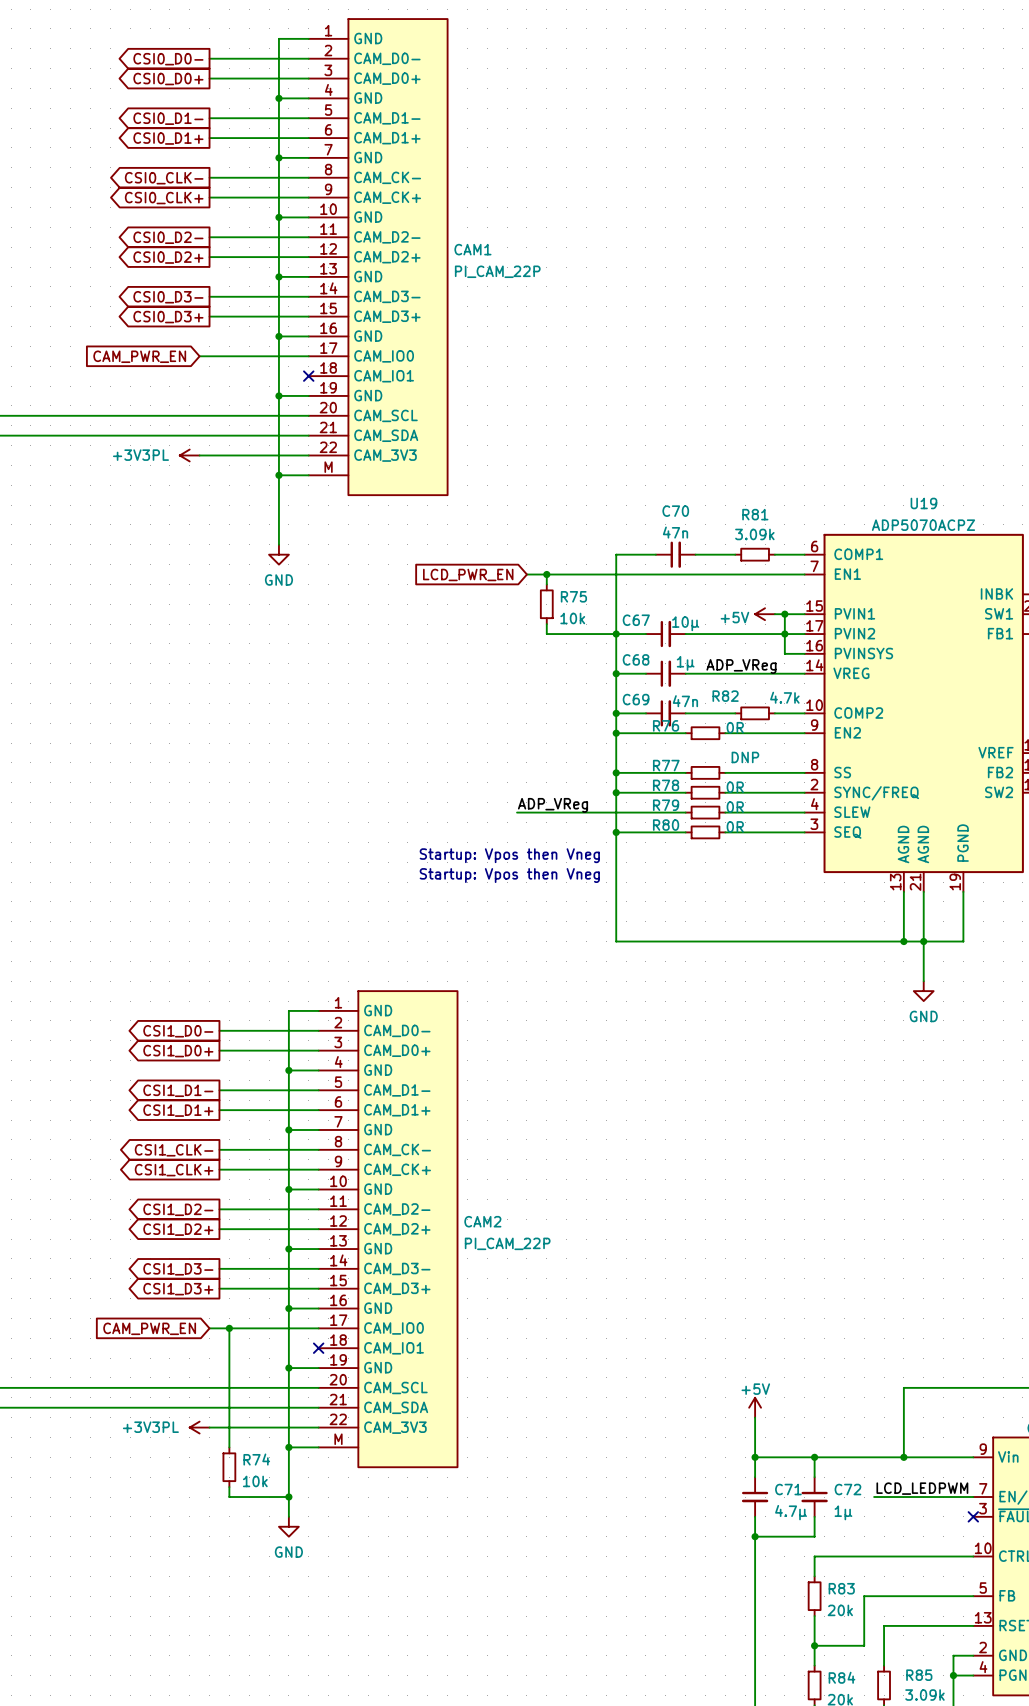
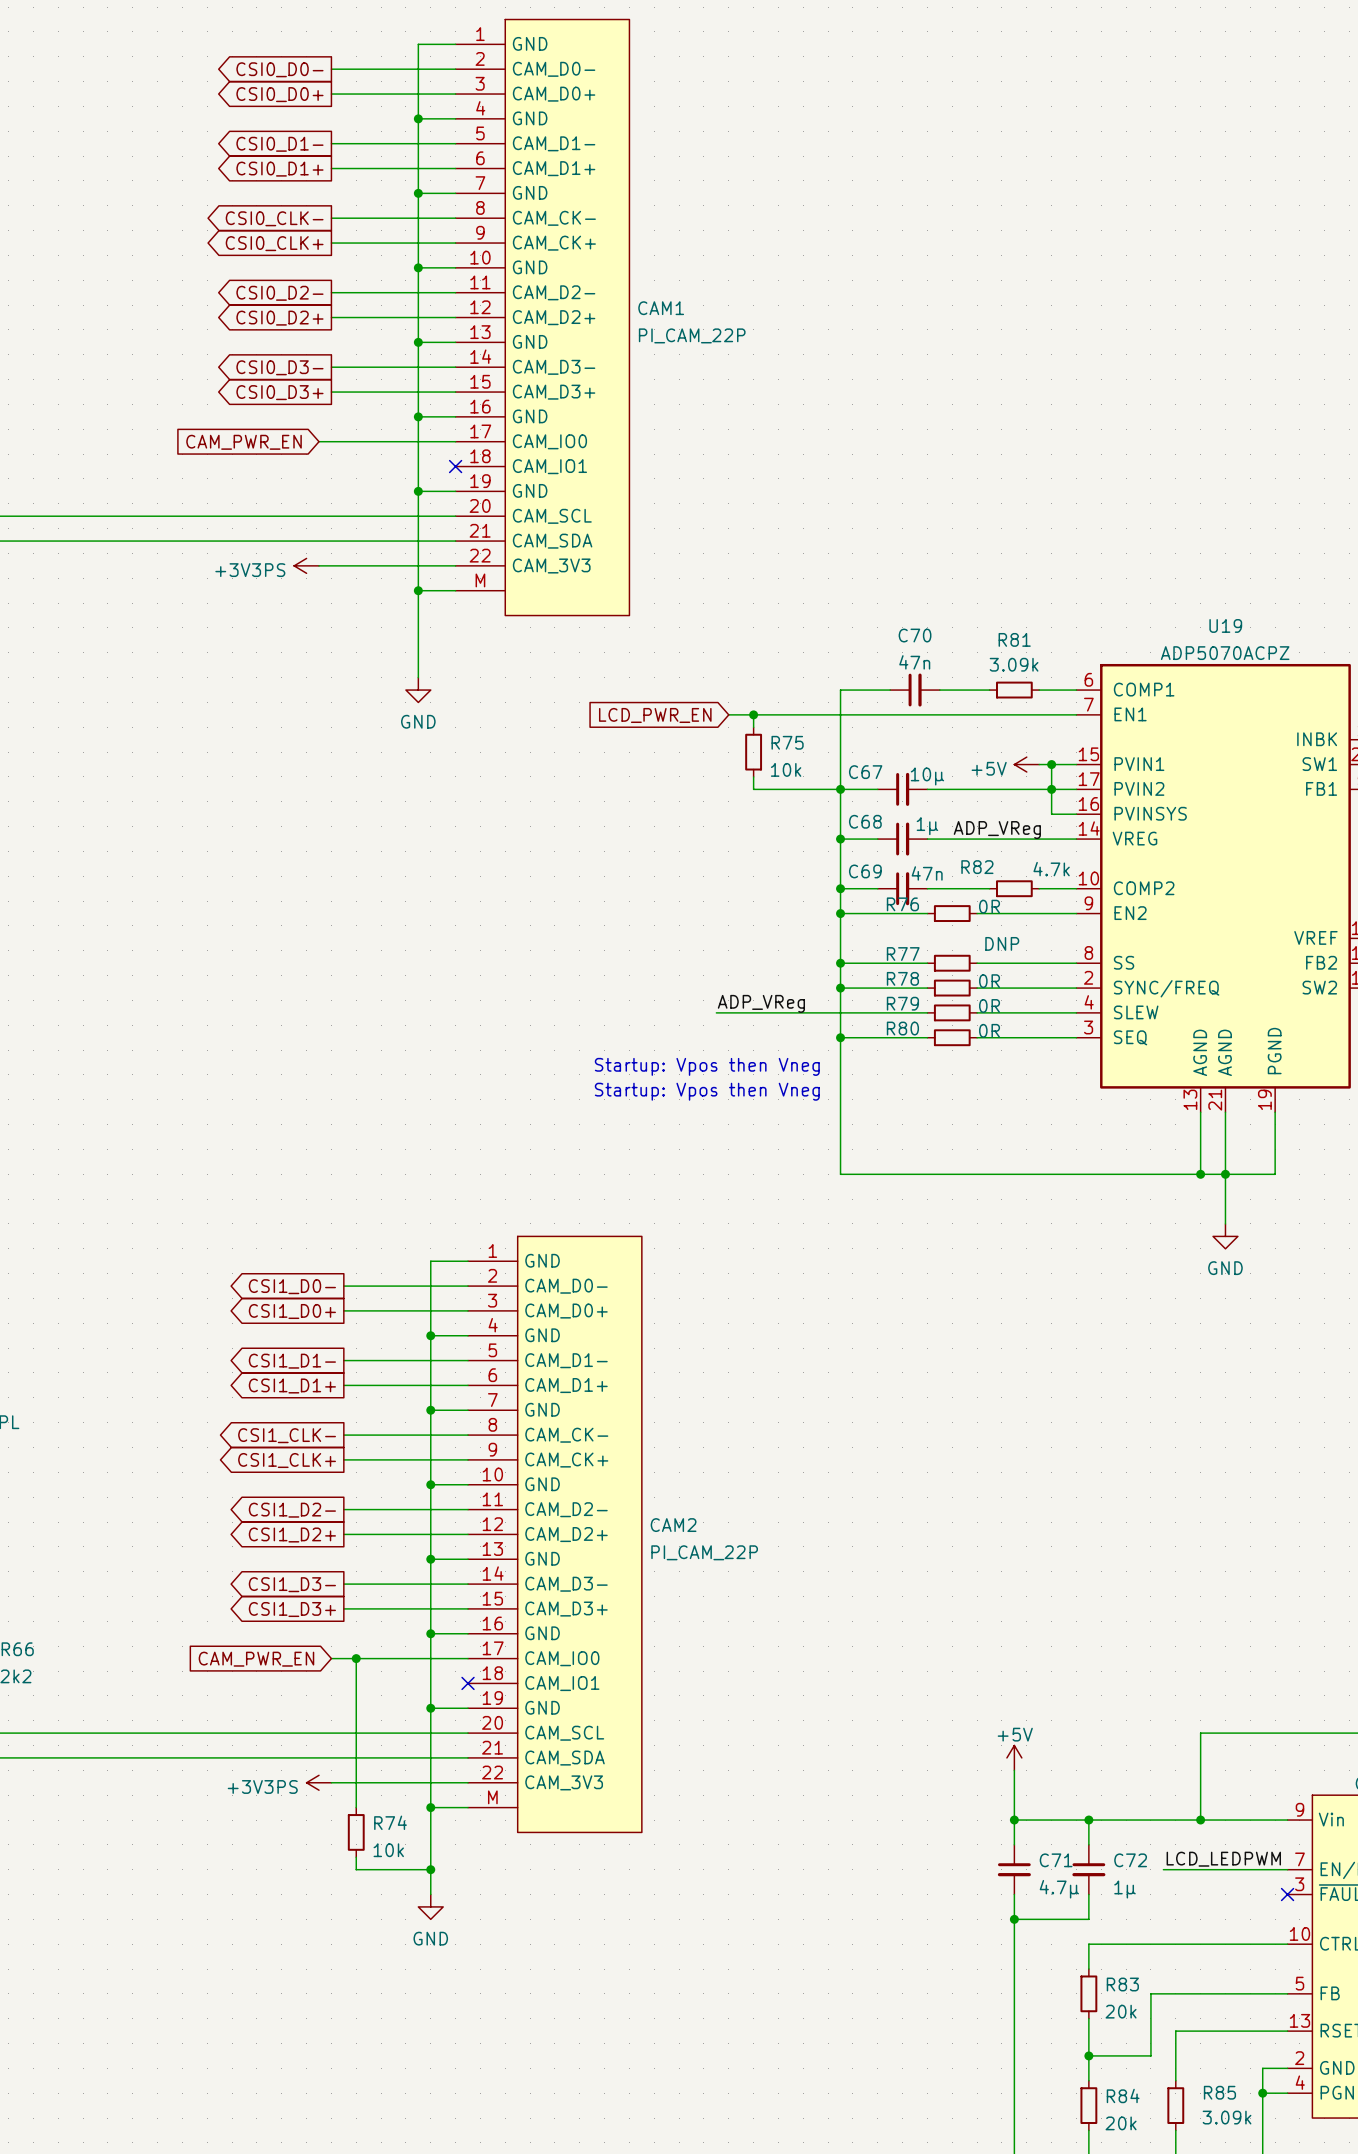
power symbol: +3V3PL (189, 455) -> +3V3PS (306, 565)
power symbol: +3V3PL (199, 1427) -> +3V3PS (319, 1782)

